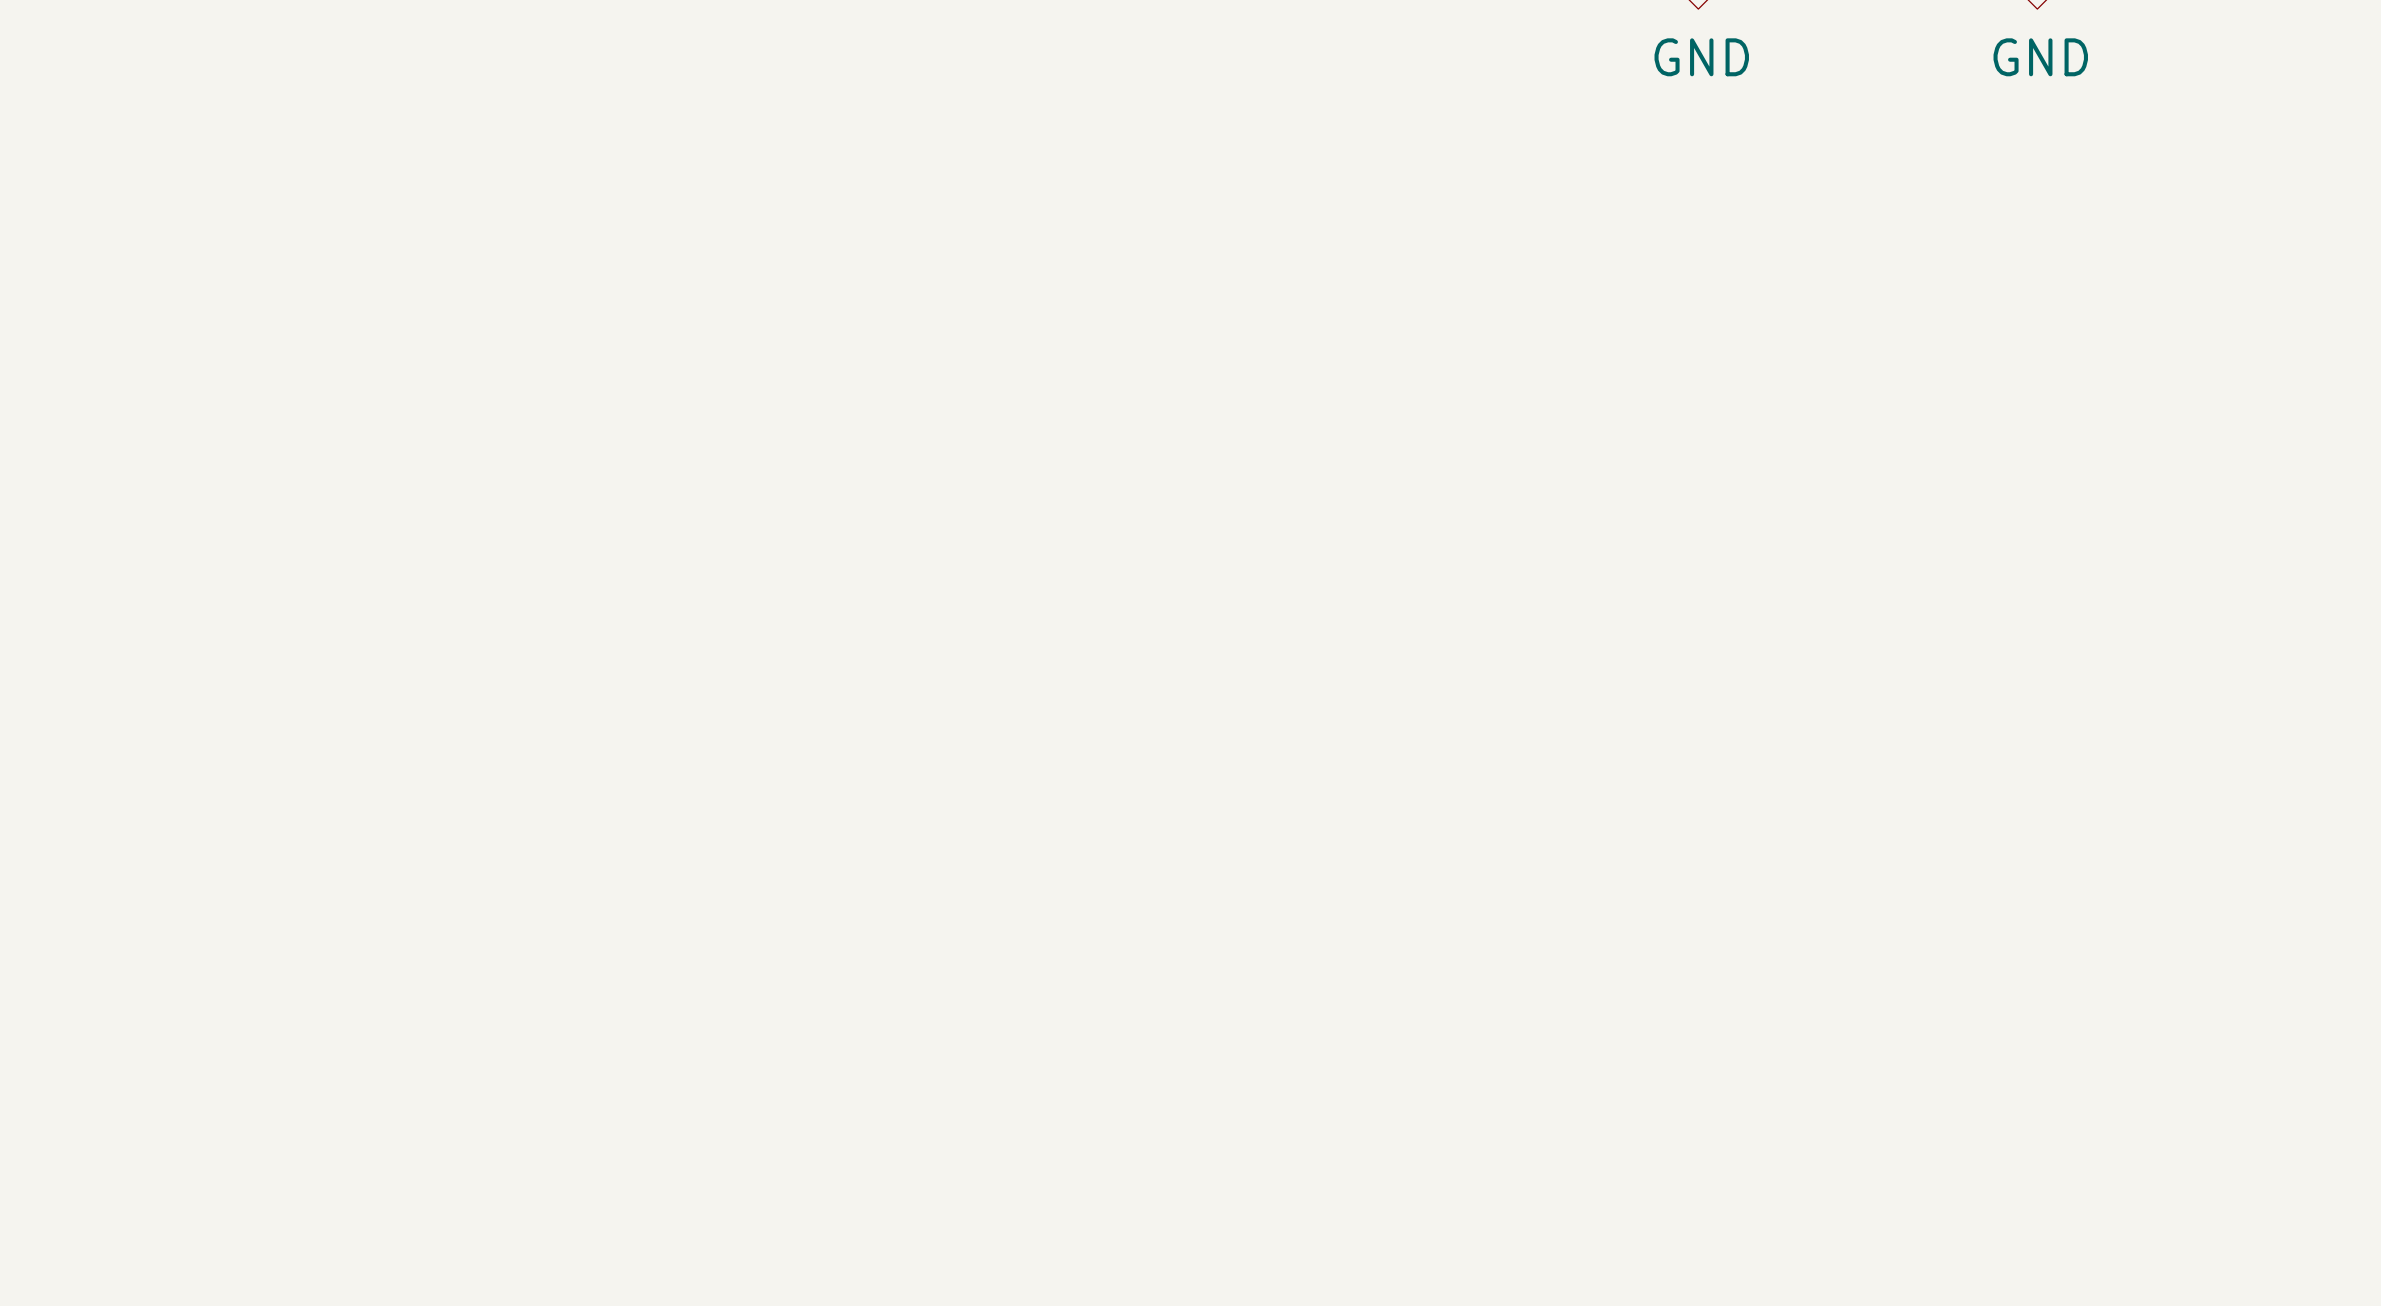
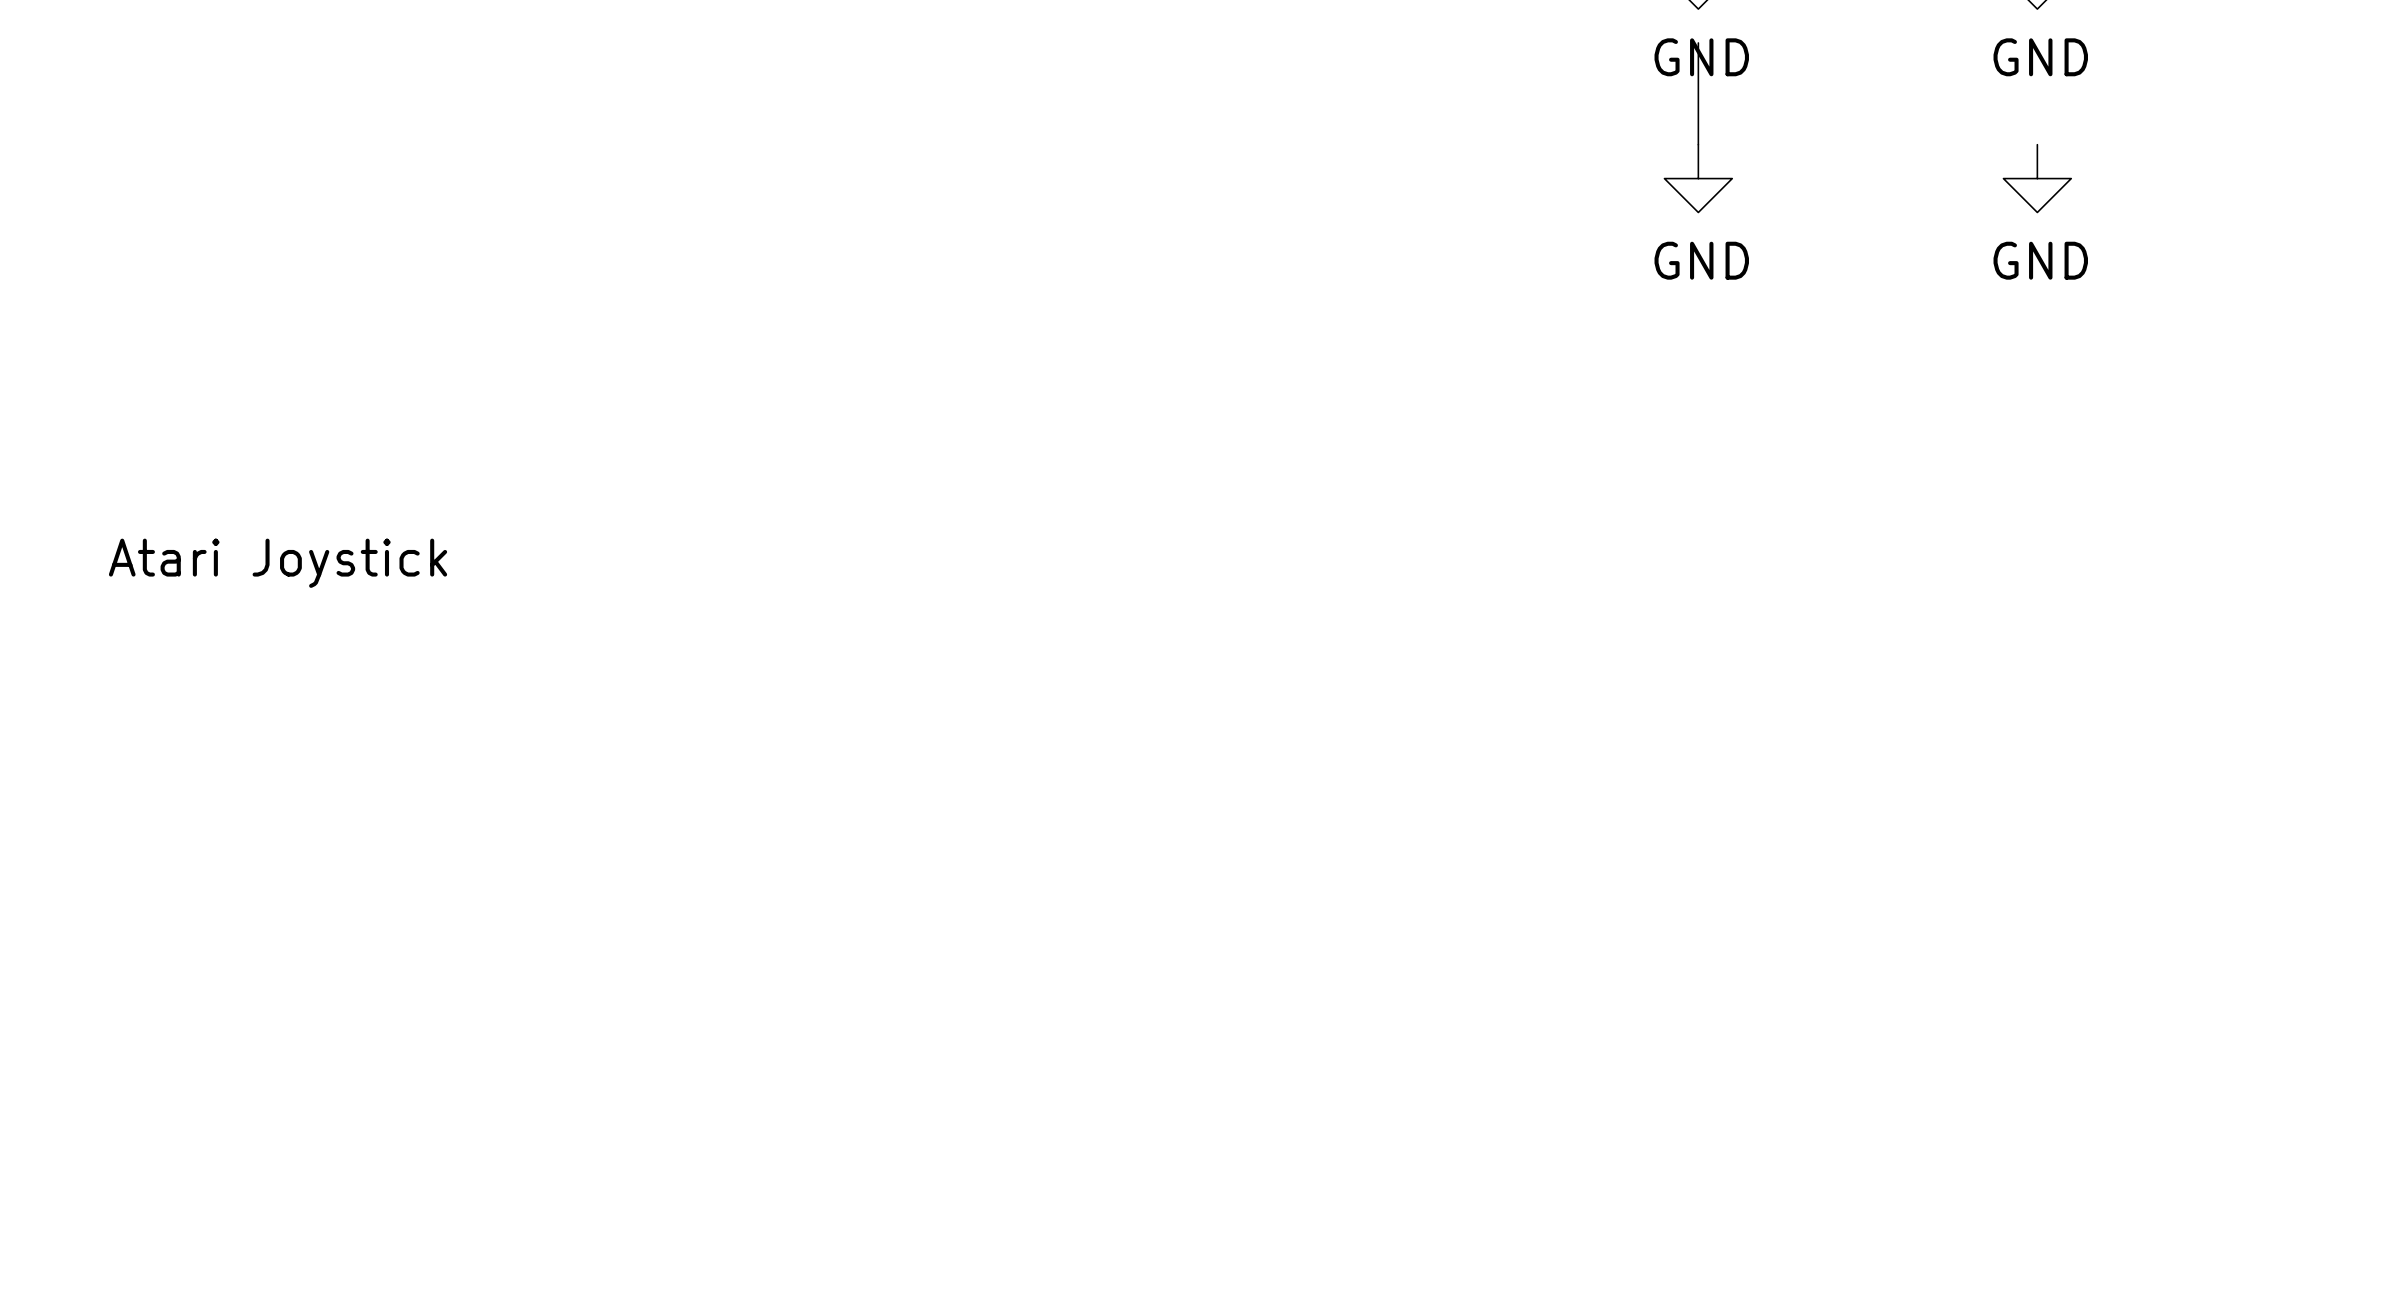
wire: none -> (1698, 42) (1698, 144)
power symbol: none -> GND (1698, 178)
power symbol: none -> GND (2037, 178)
text: none -> Atari Joystick (278, 563)

